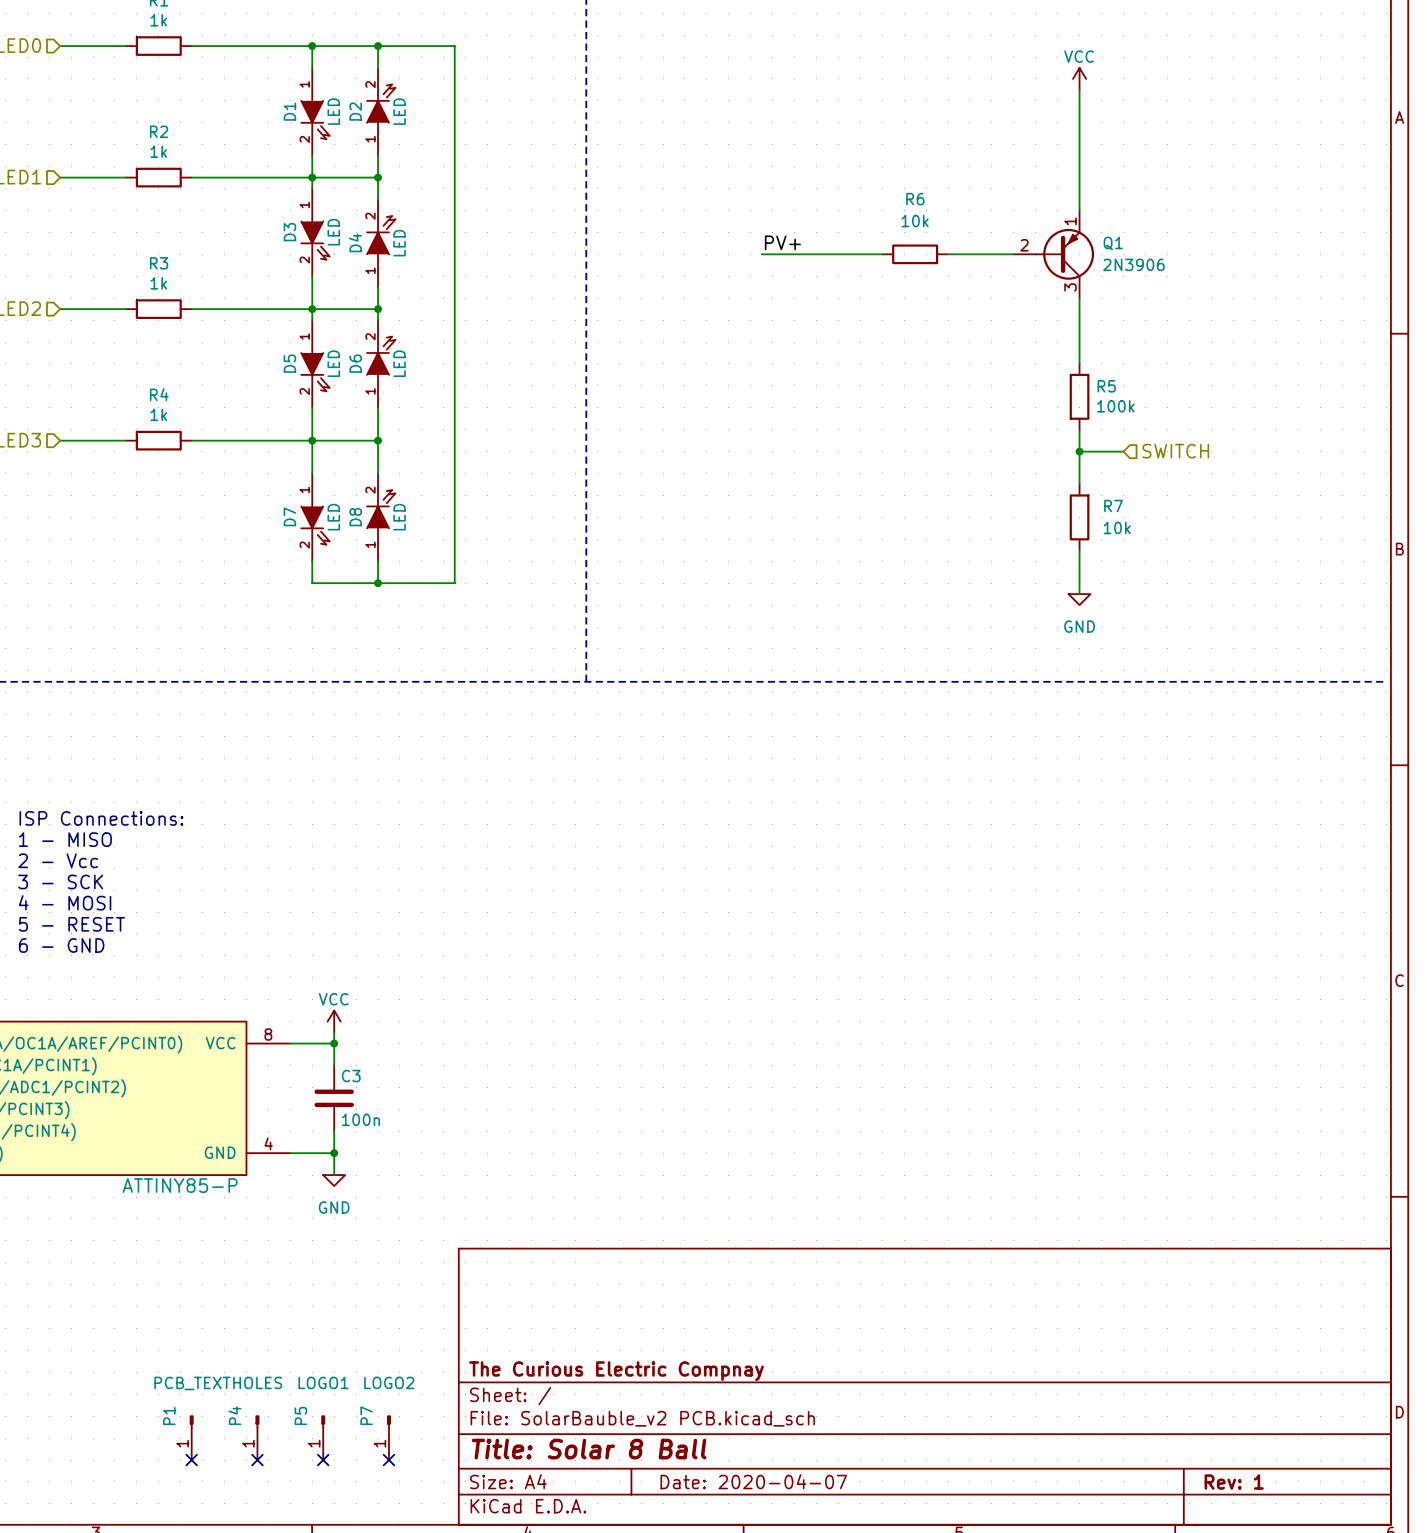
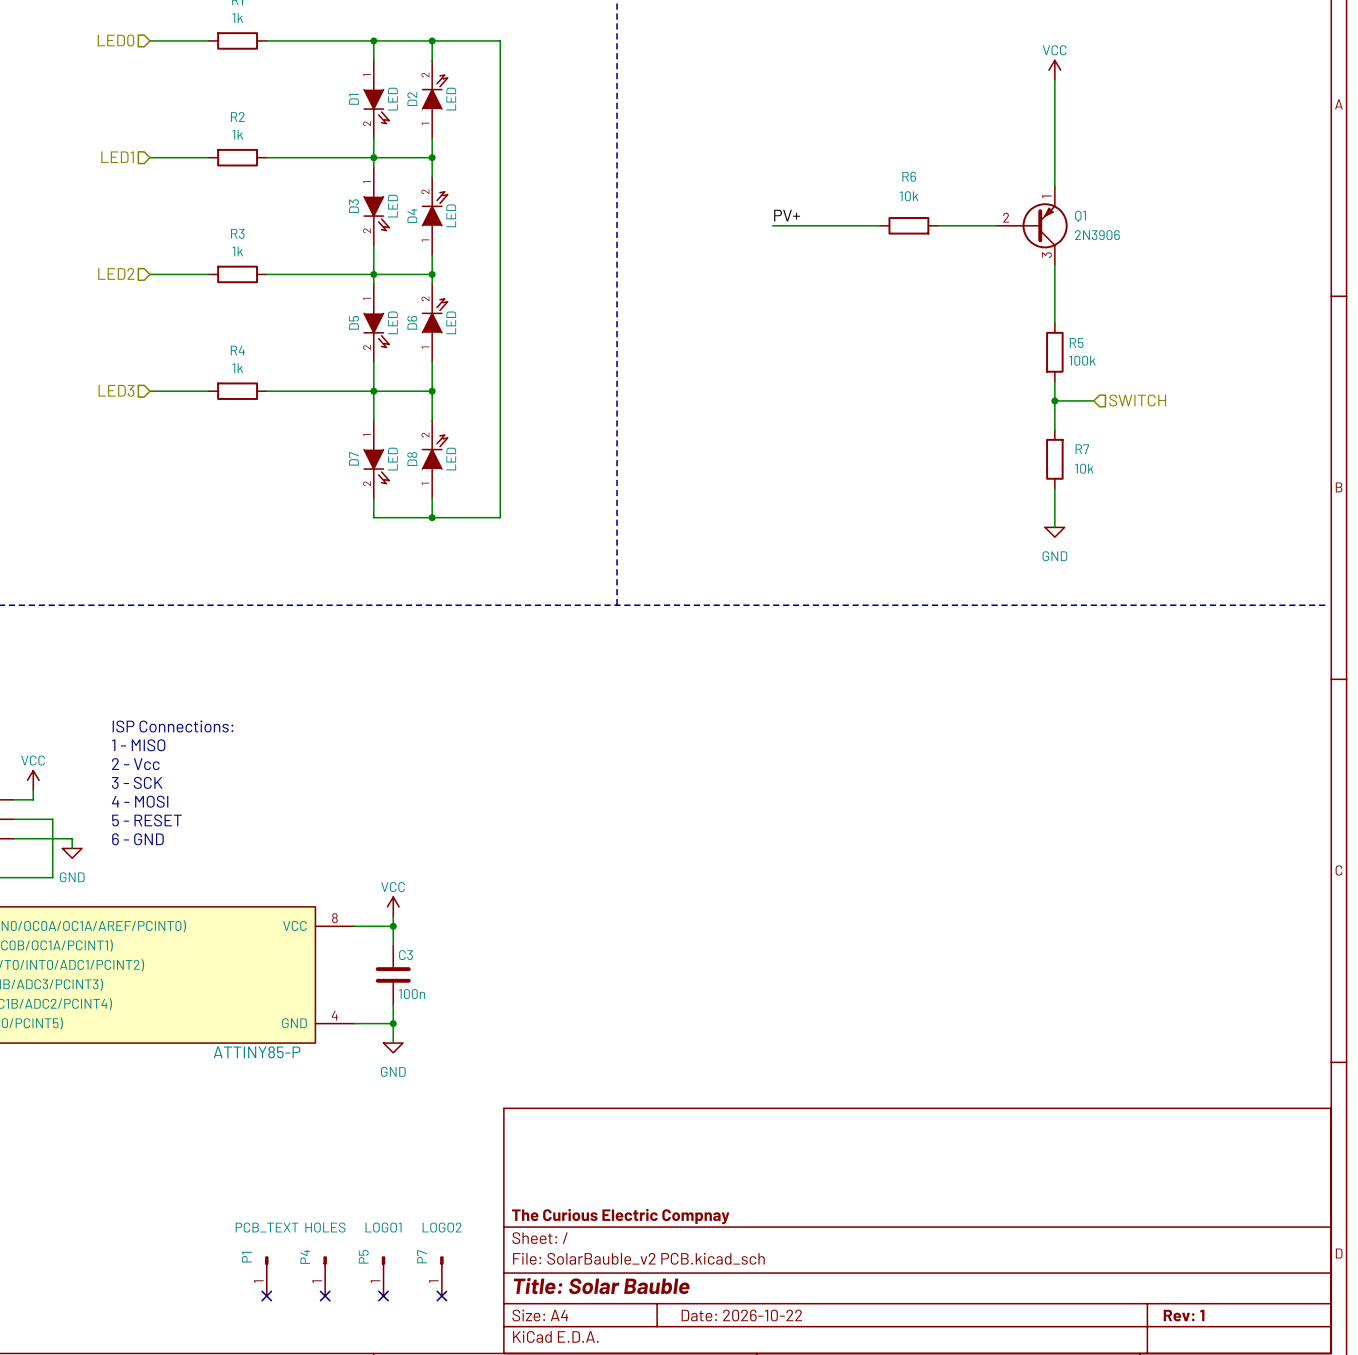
title block: Title: Solar 8 Ball (589, 1449) -> Title: Solar Bauble (601, 1286)
title block: Date: 2020-04-07 (753, 1481) -> Date: 2026-10-22 (741, 1315)

